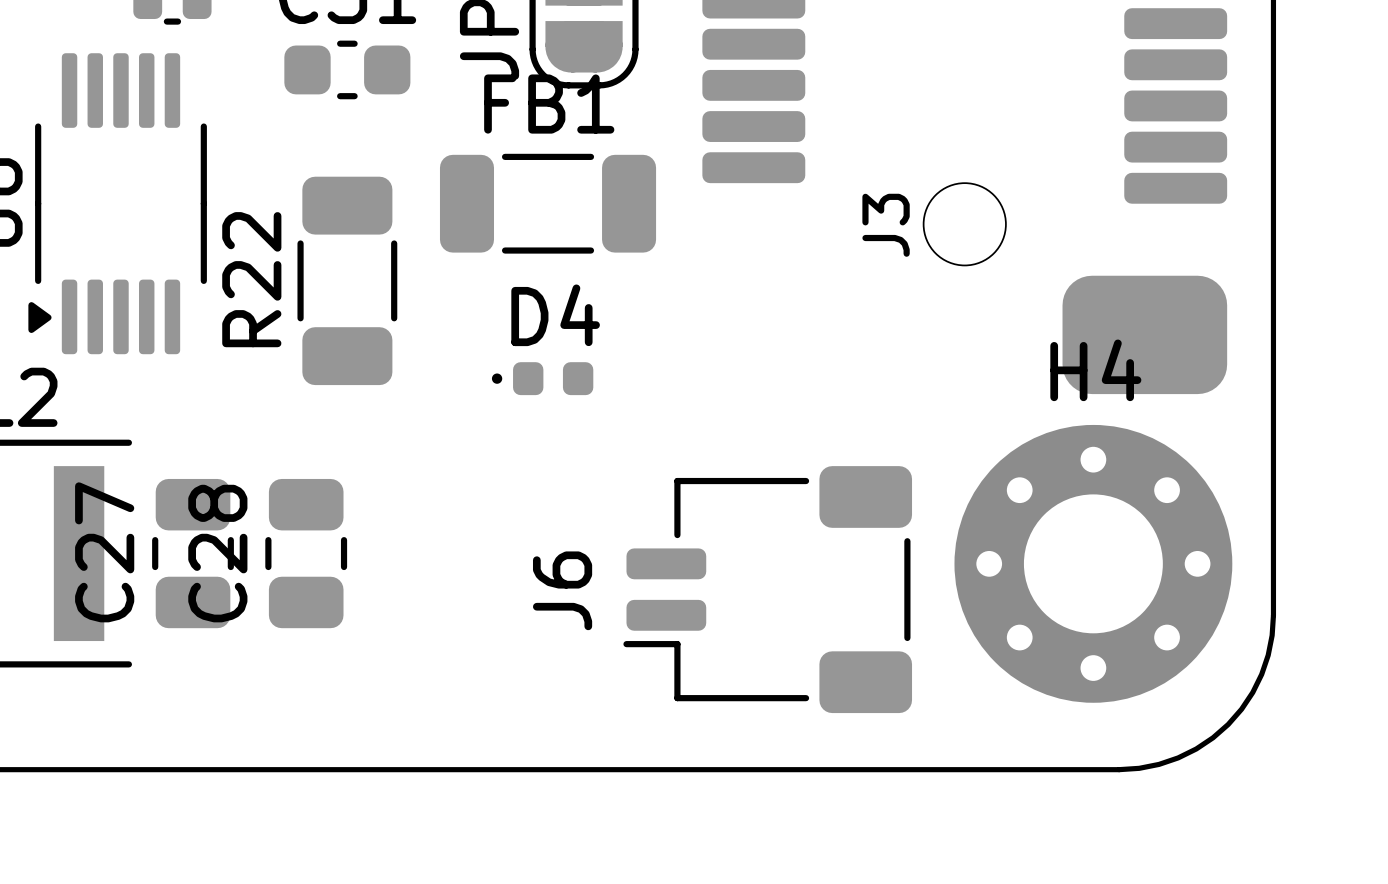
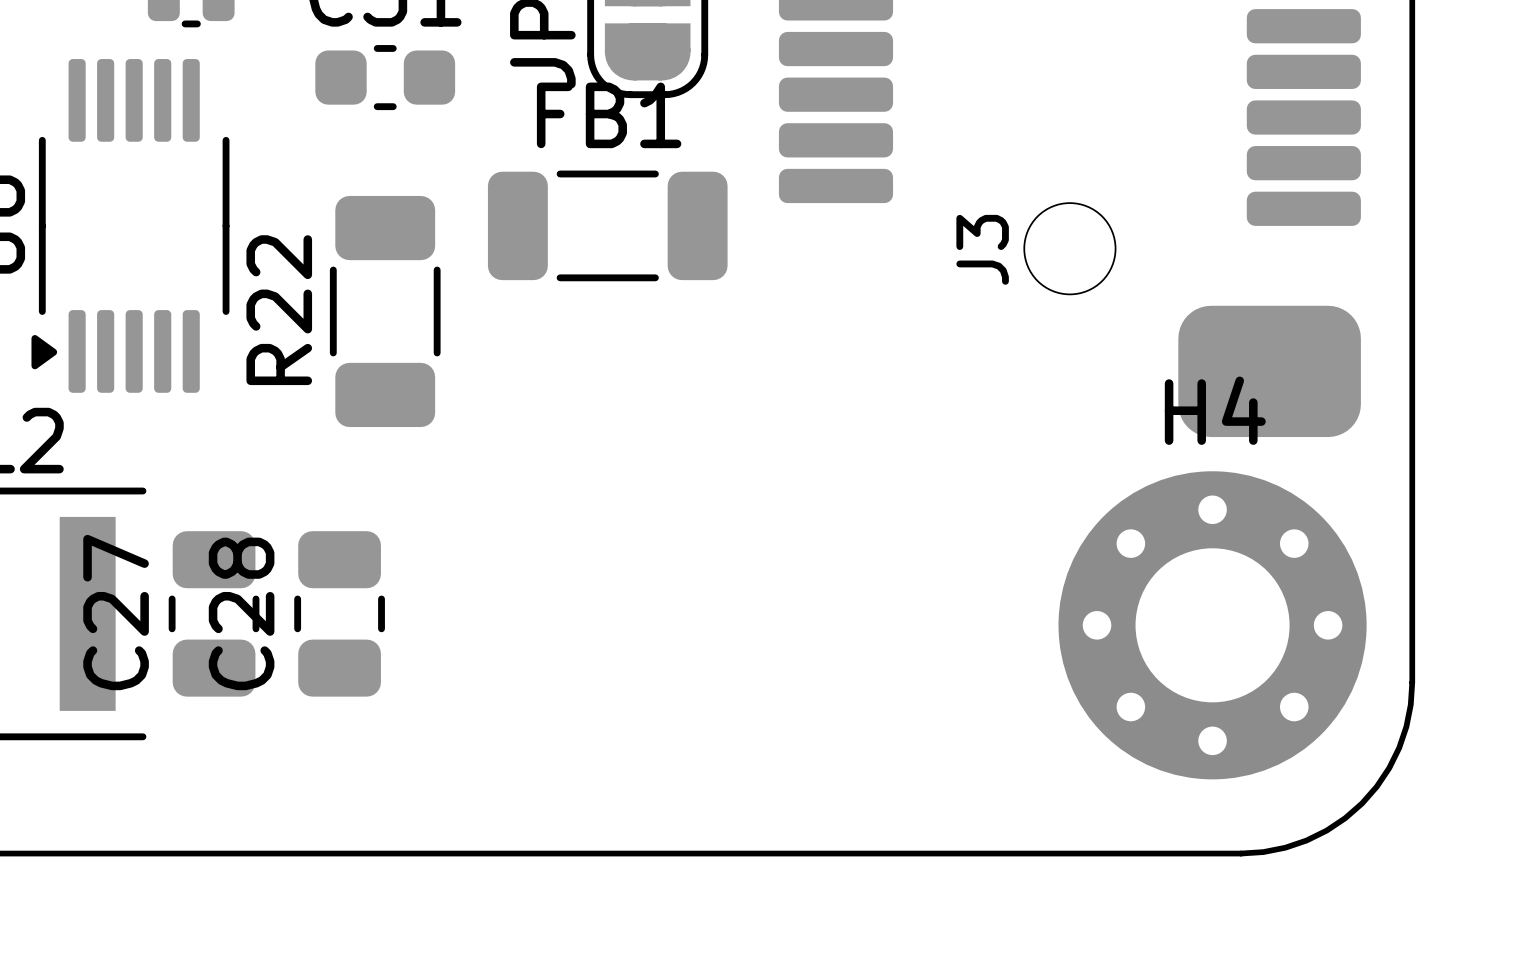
D4: (542, 378) -> none
J6: (767, 589) -> none

